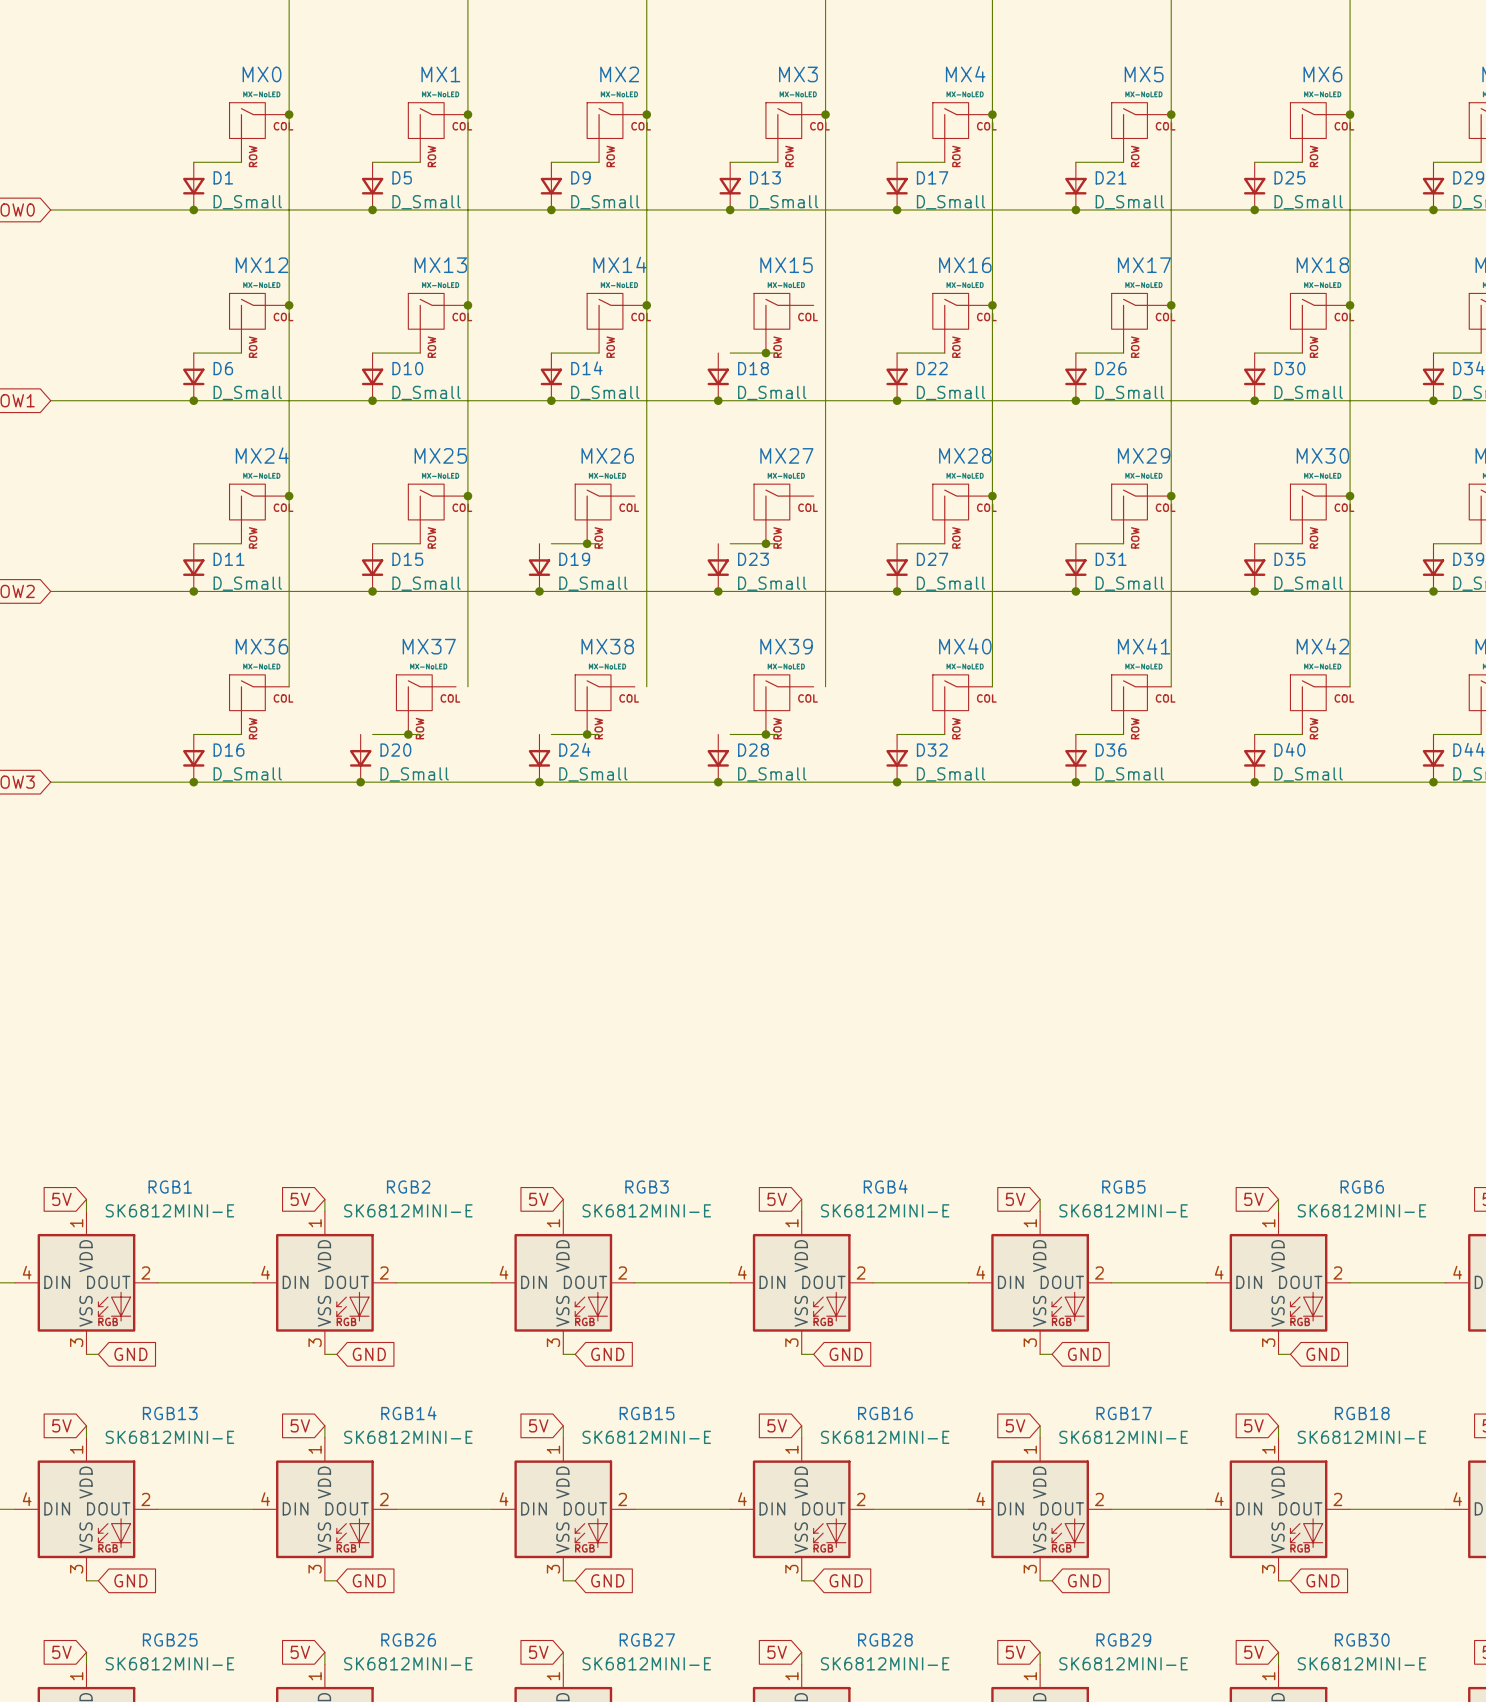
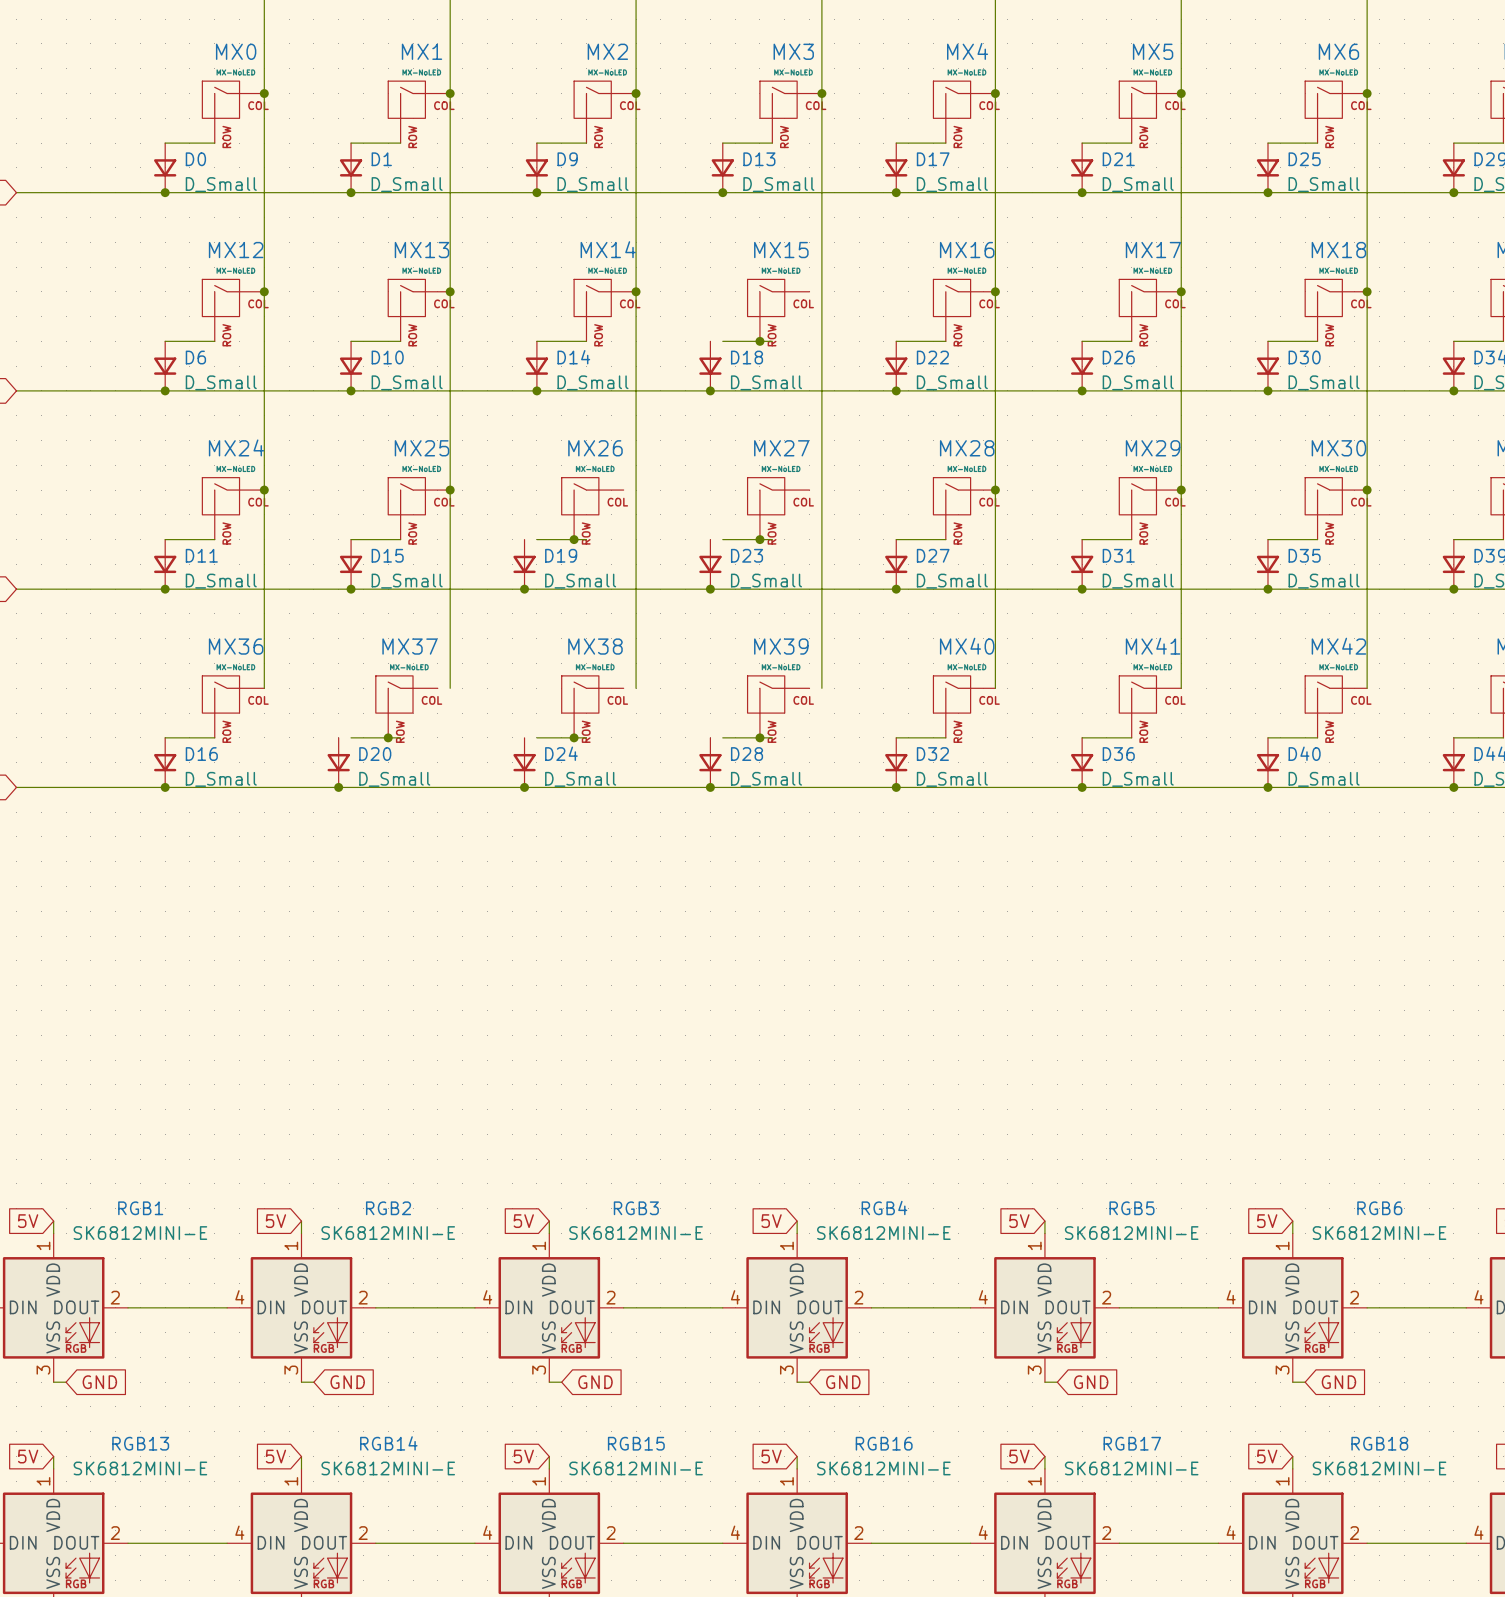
D1 name: D1 (223, 177) -> D0 (195, 159)
D5 name: D5 (402, 177) -> D1 (381, 159)

